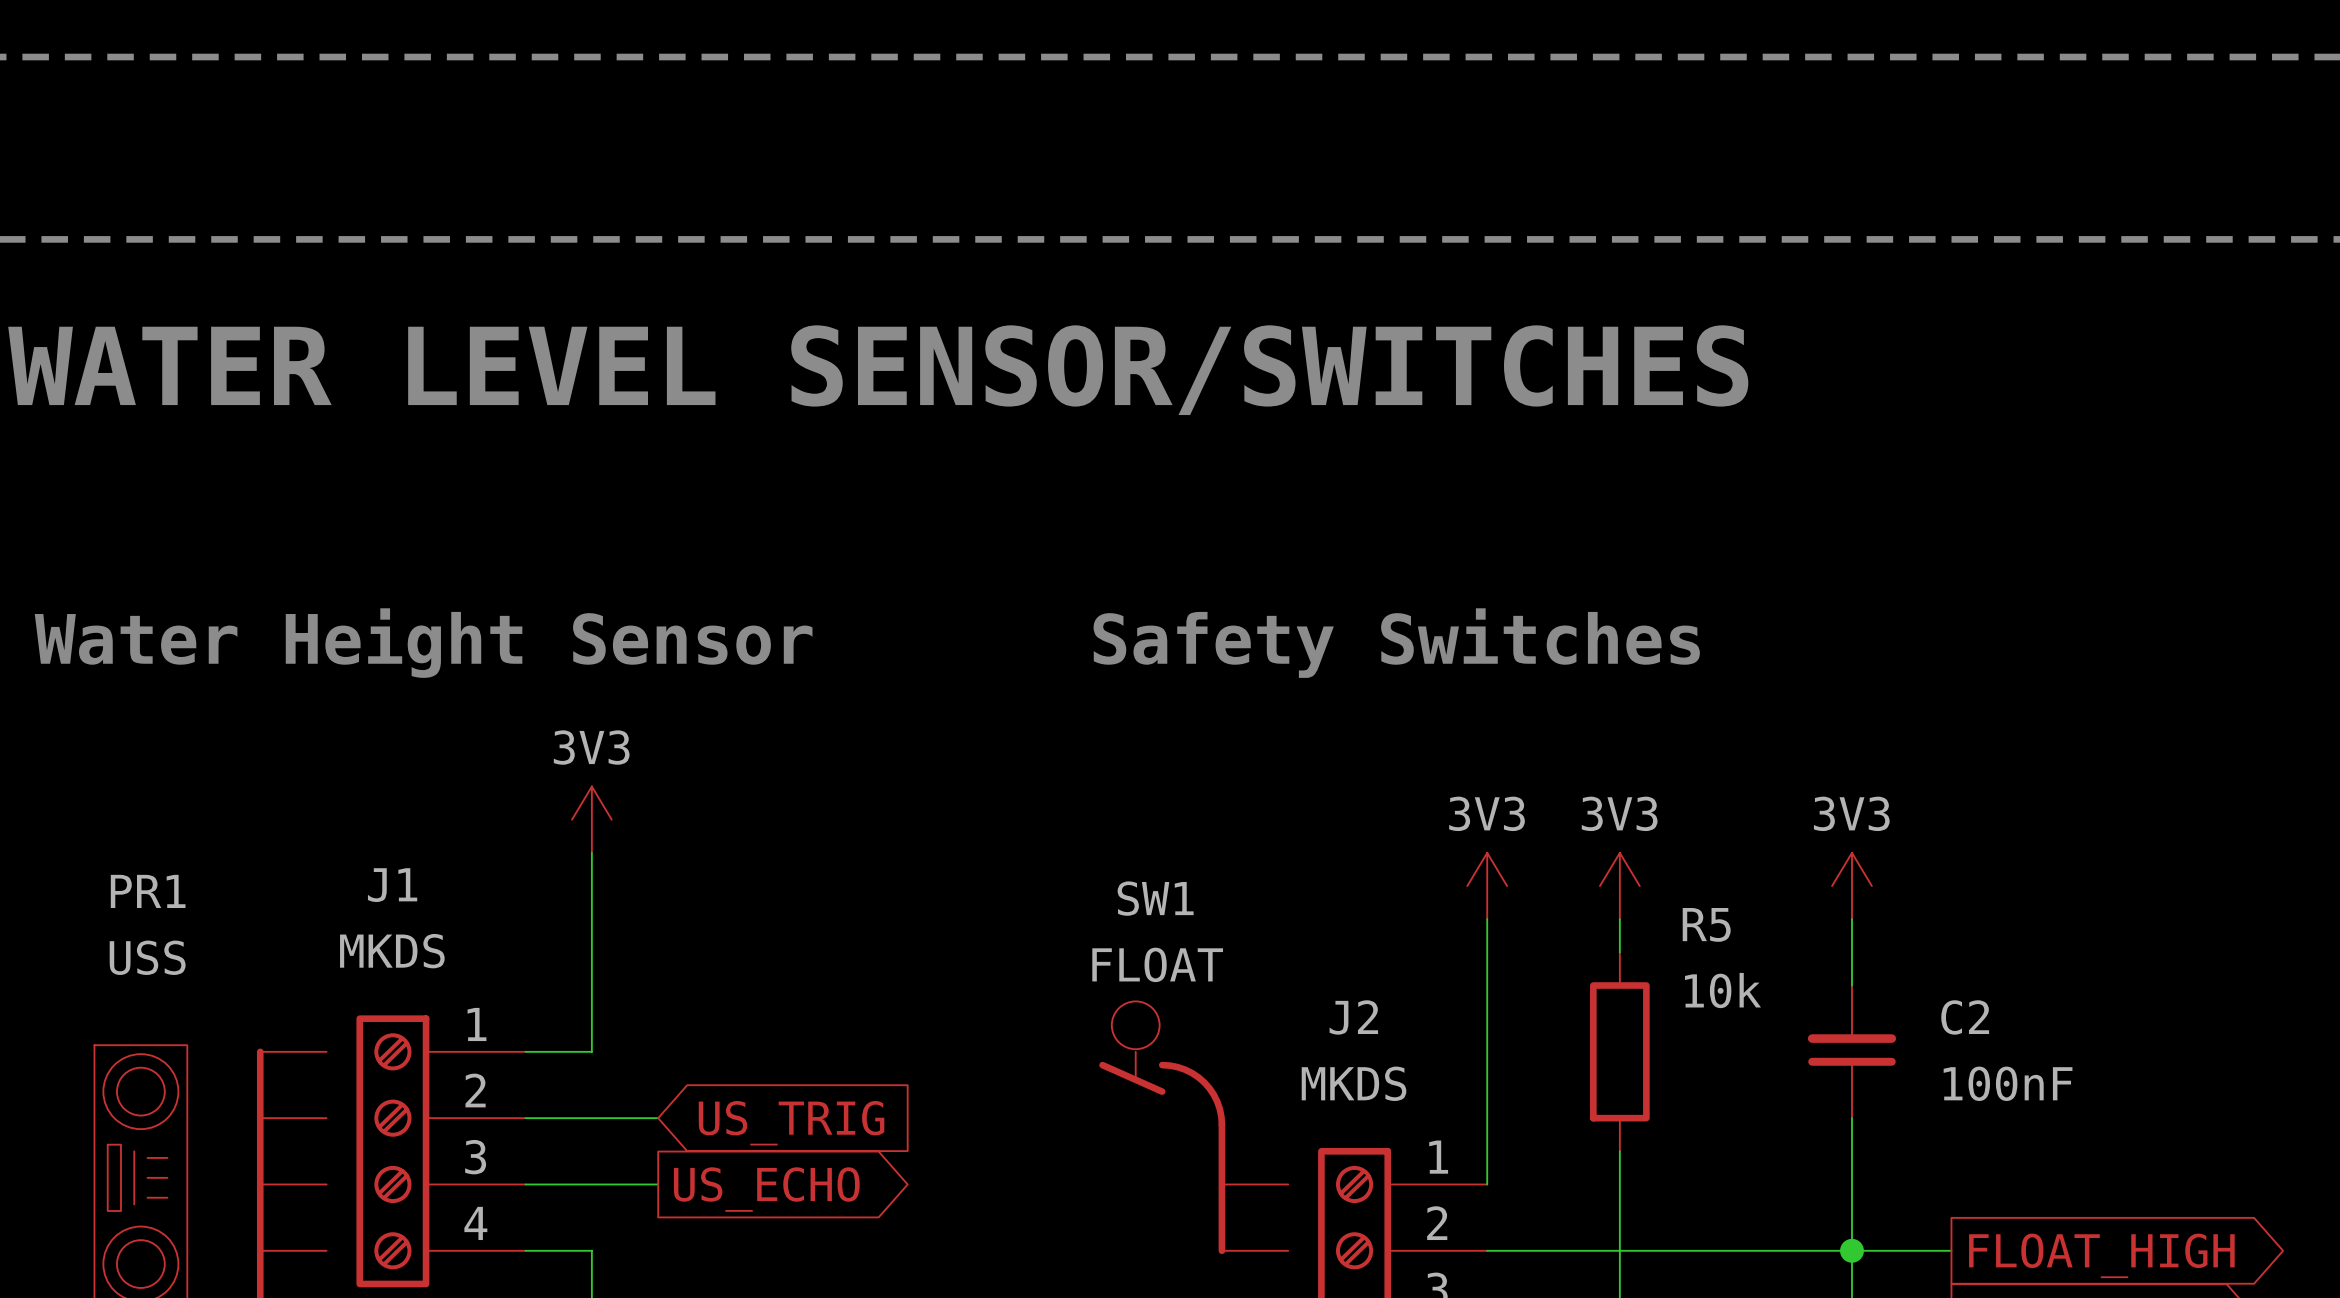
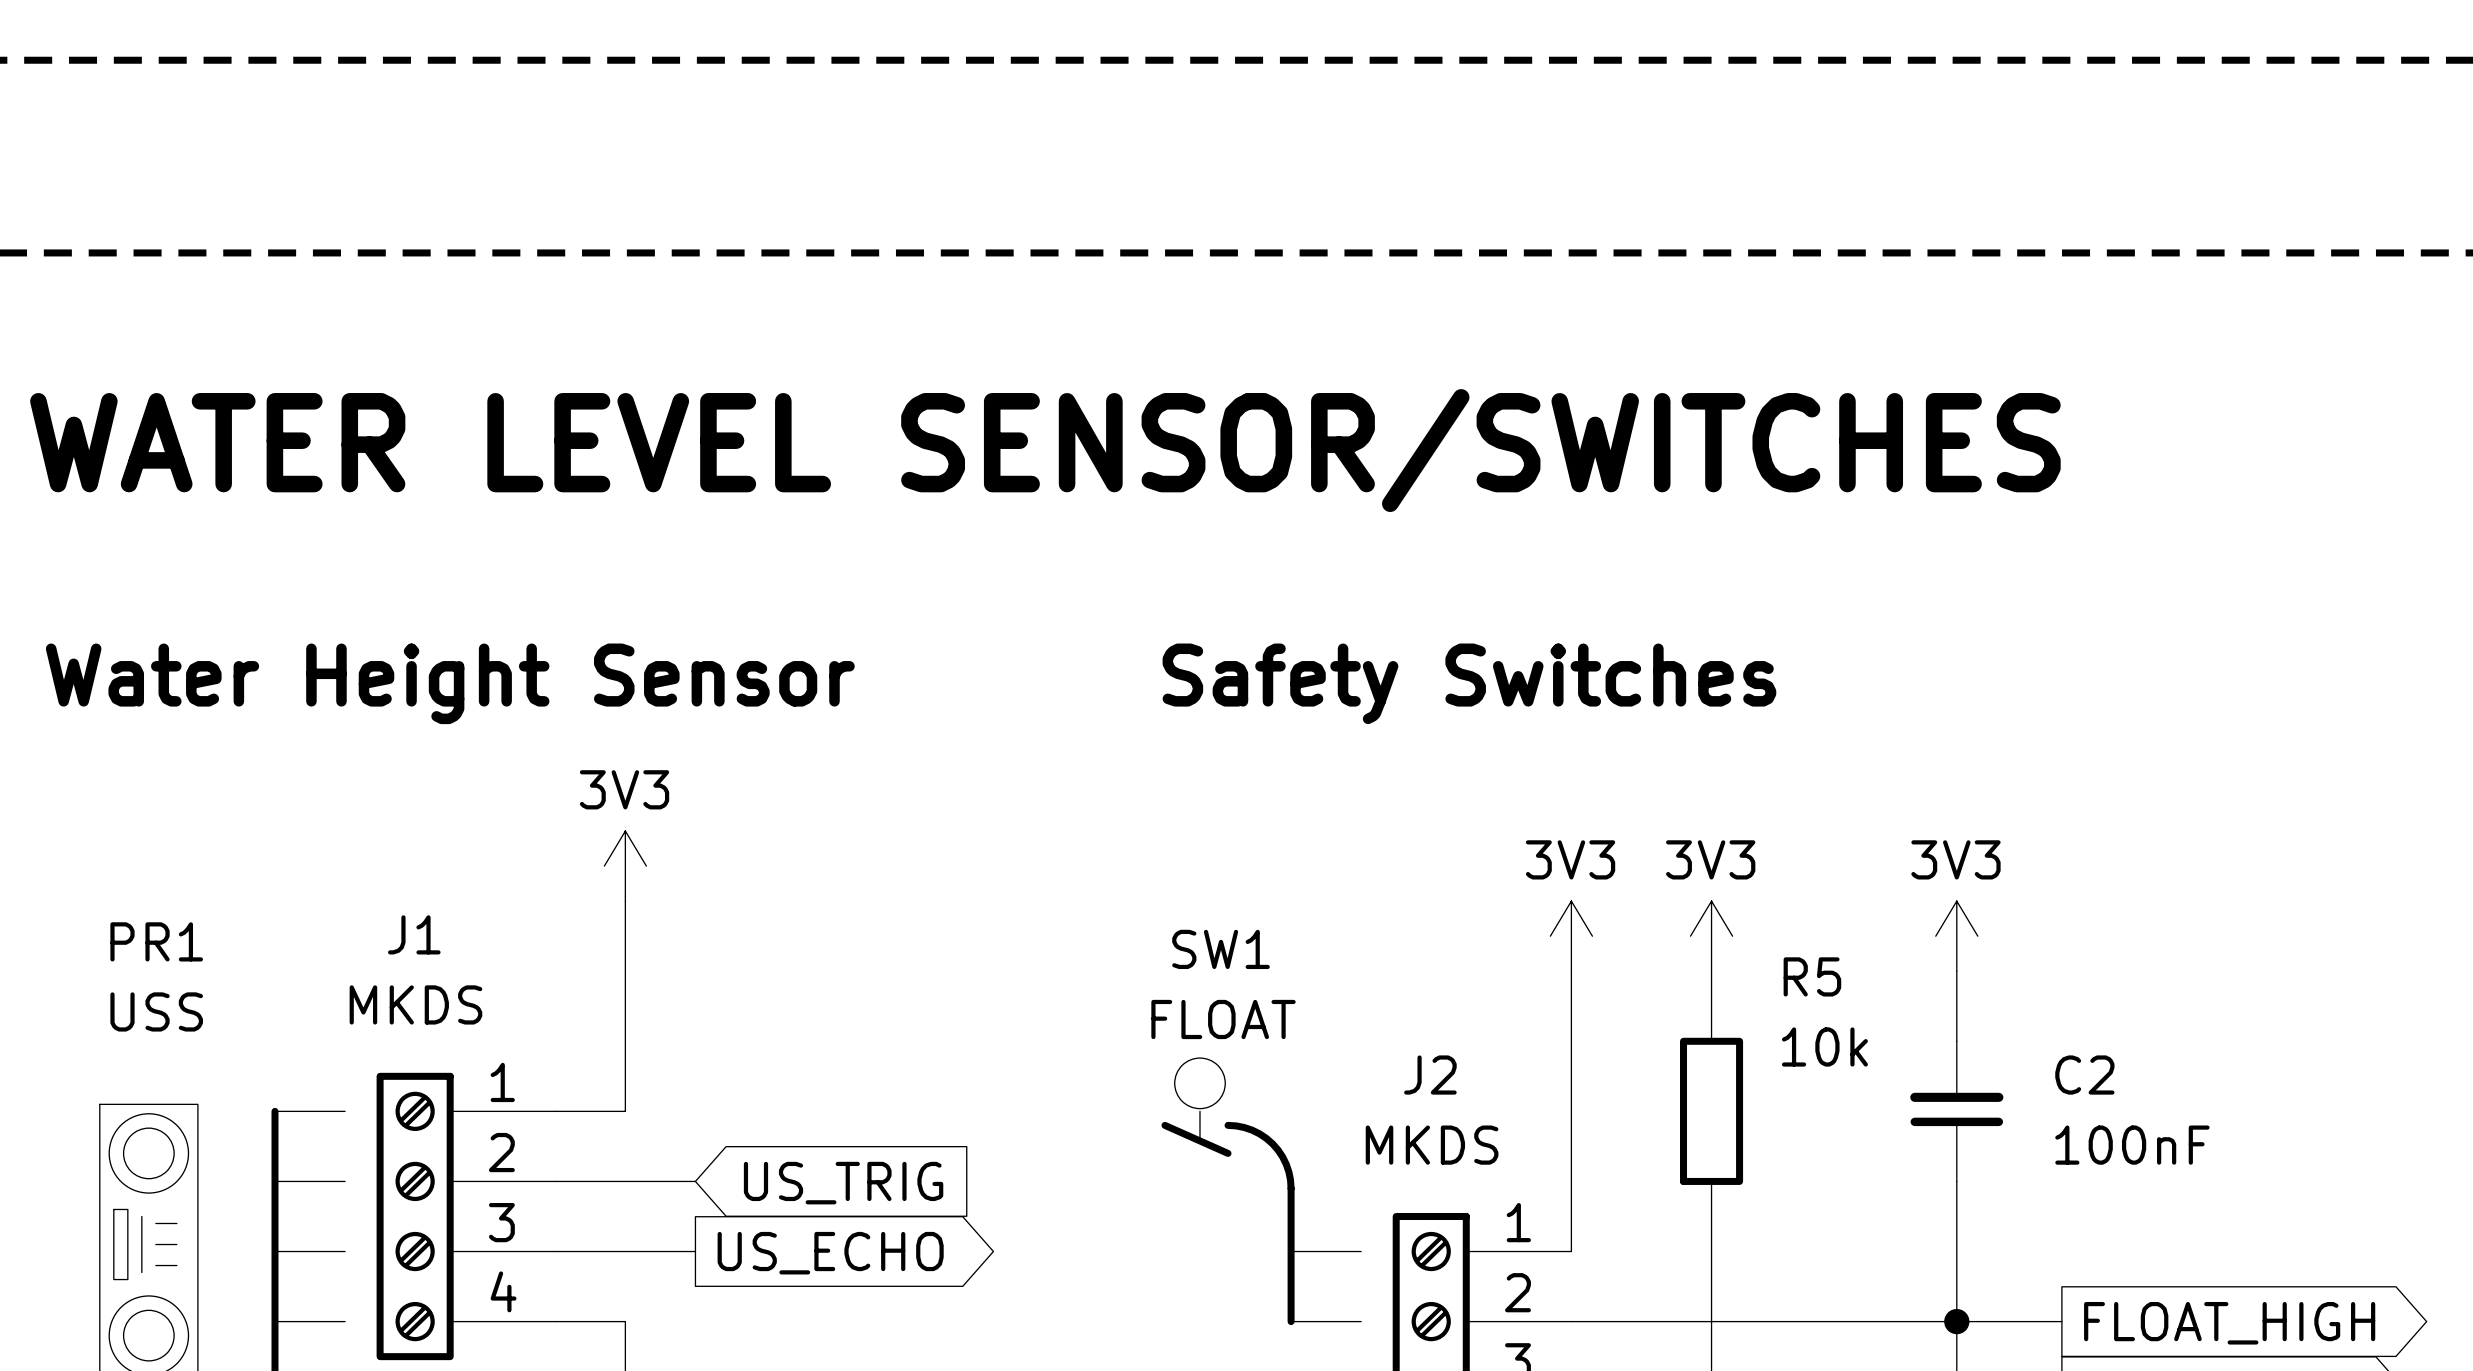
text position: WATER LEVEL SENSOR/SWITCHES (878, 370) -> WATER LEVEL SENSOR/SWITCHES (1045, 450)

